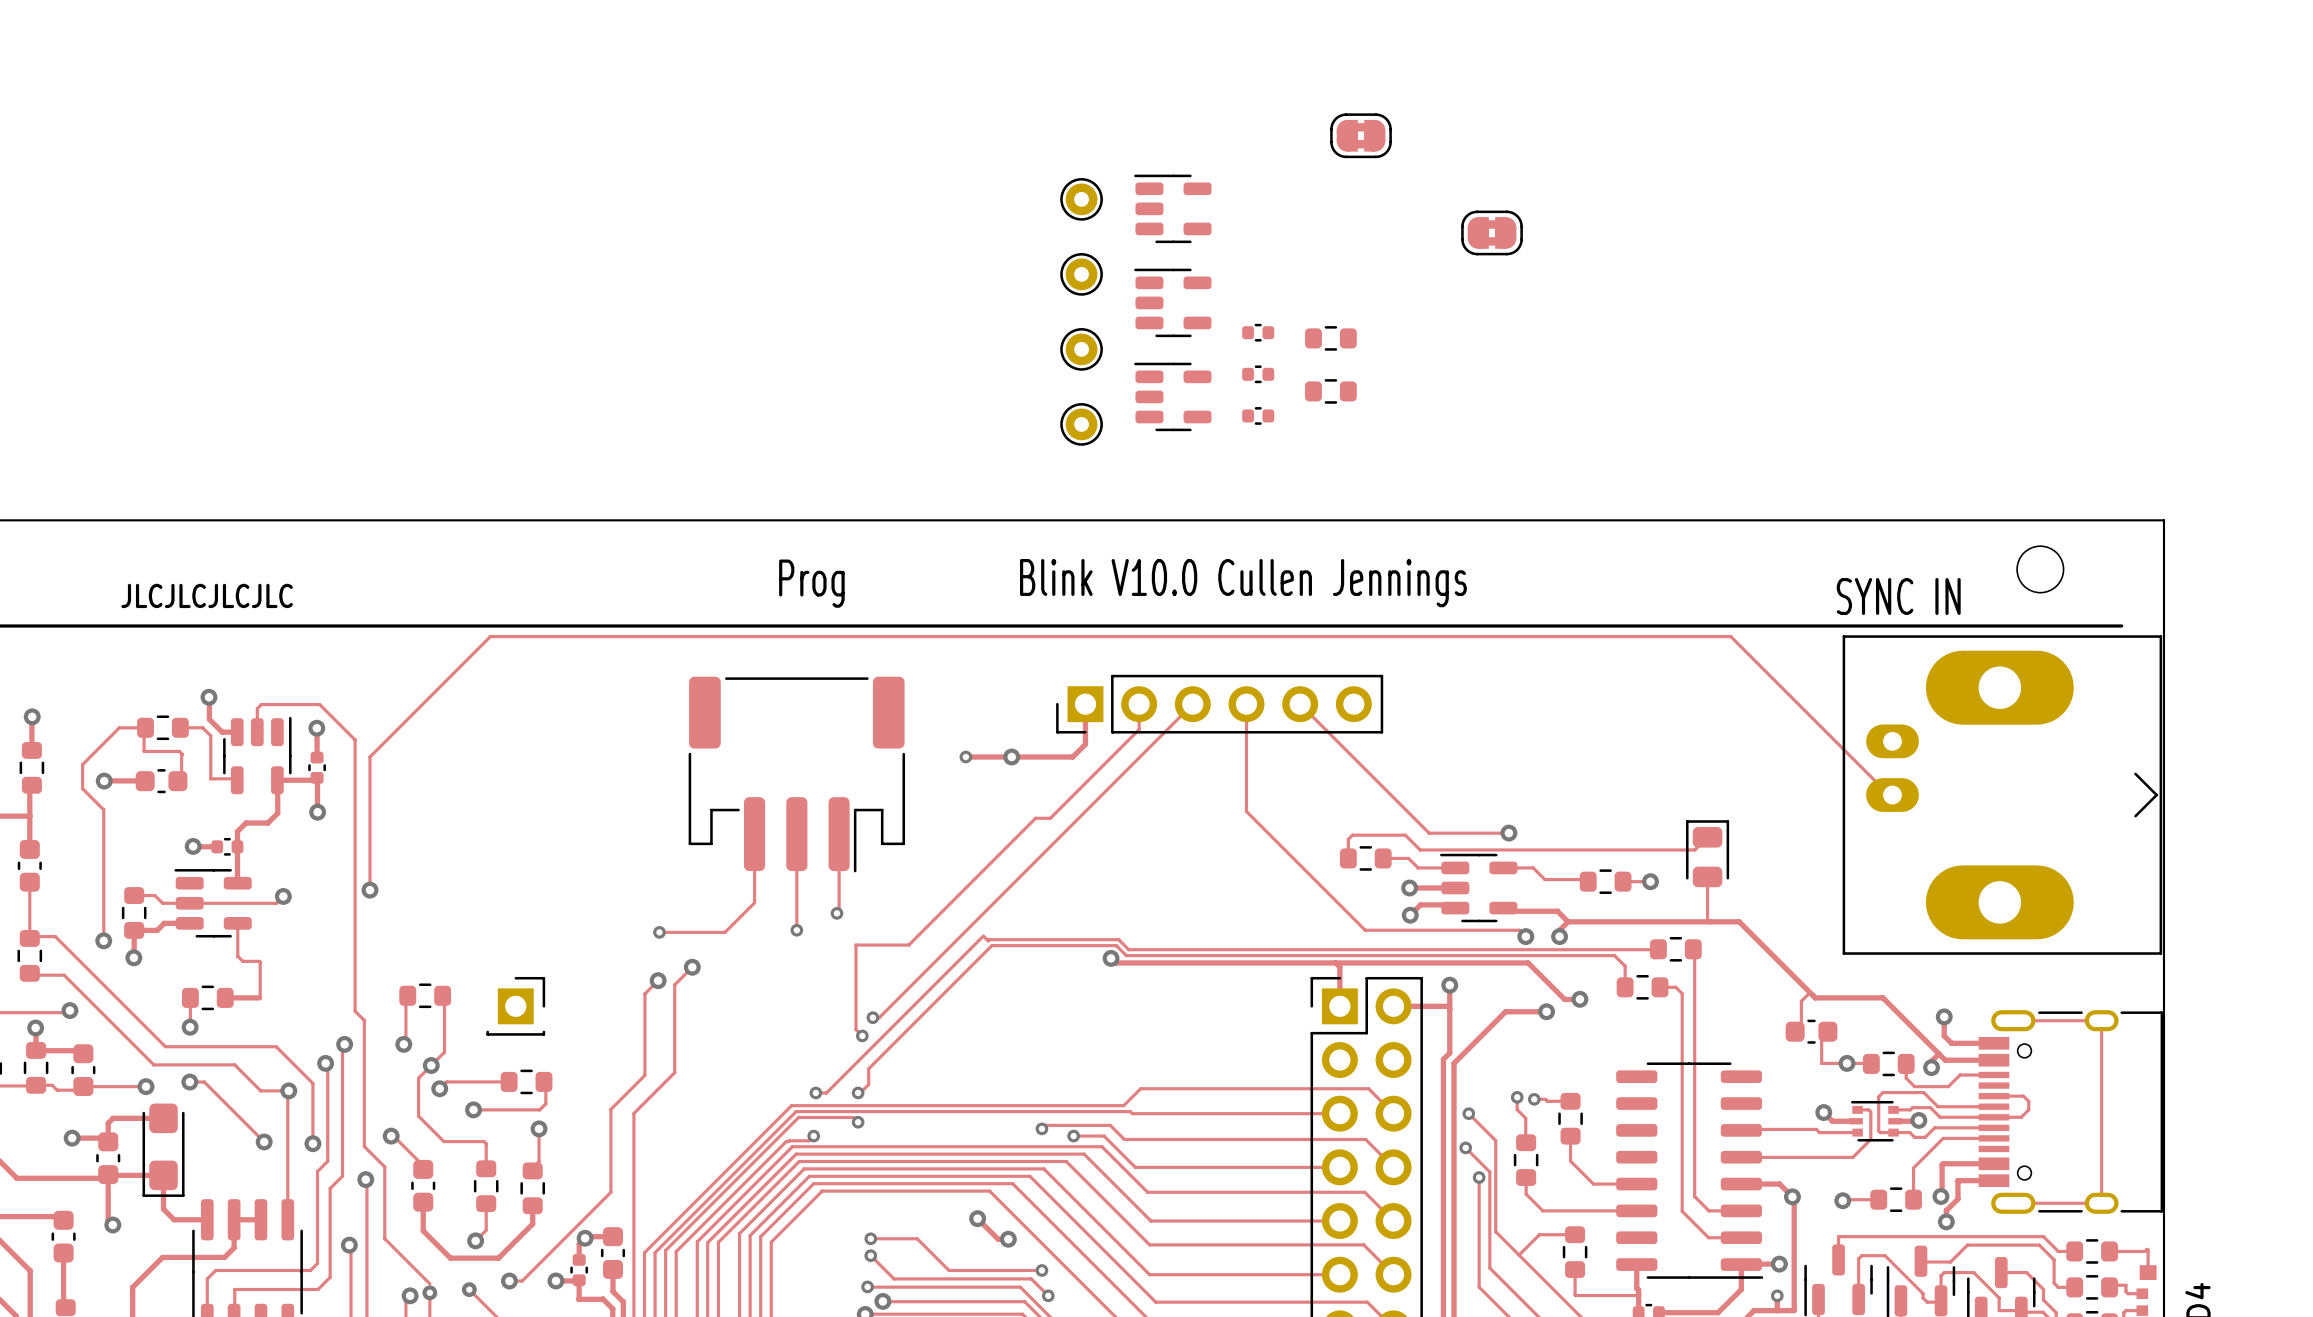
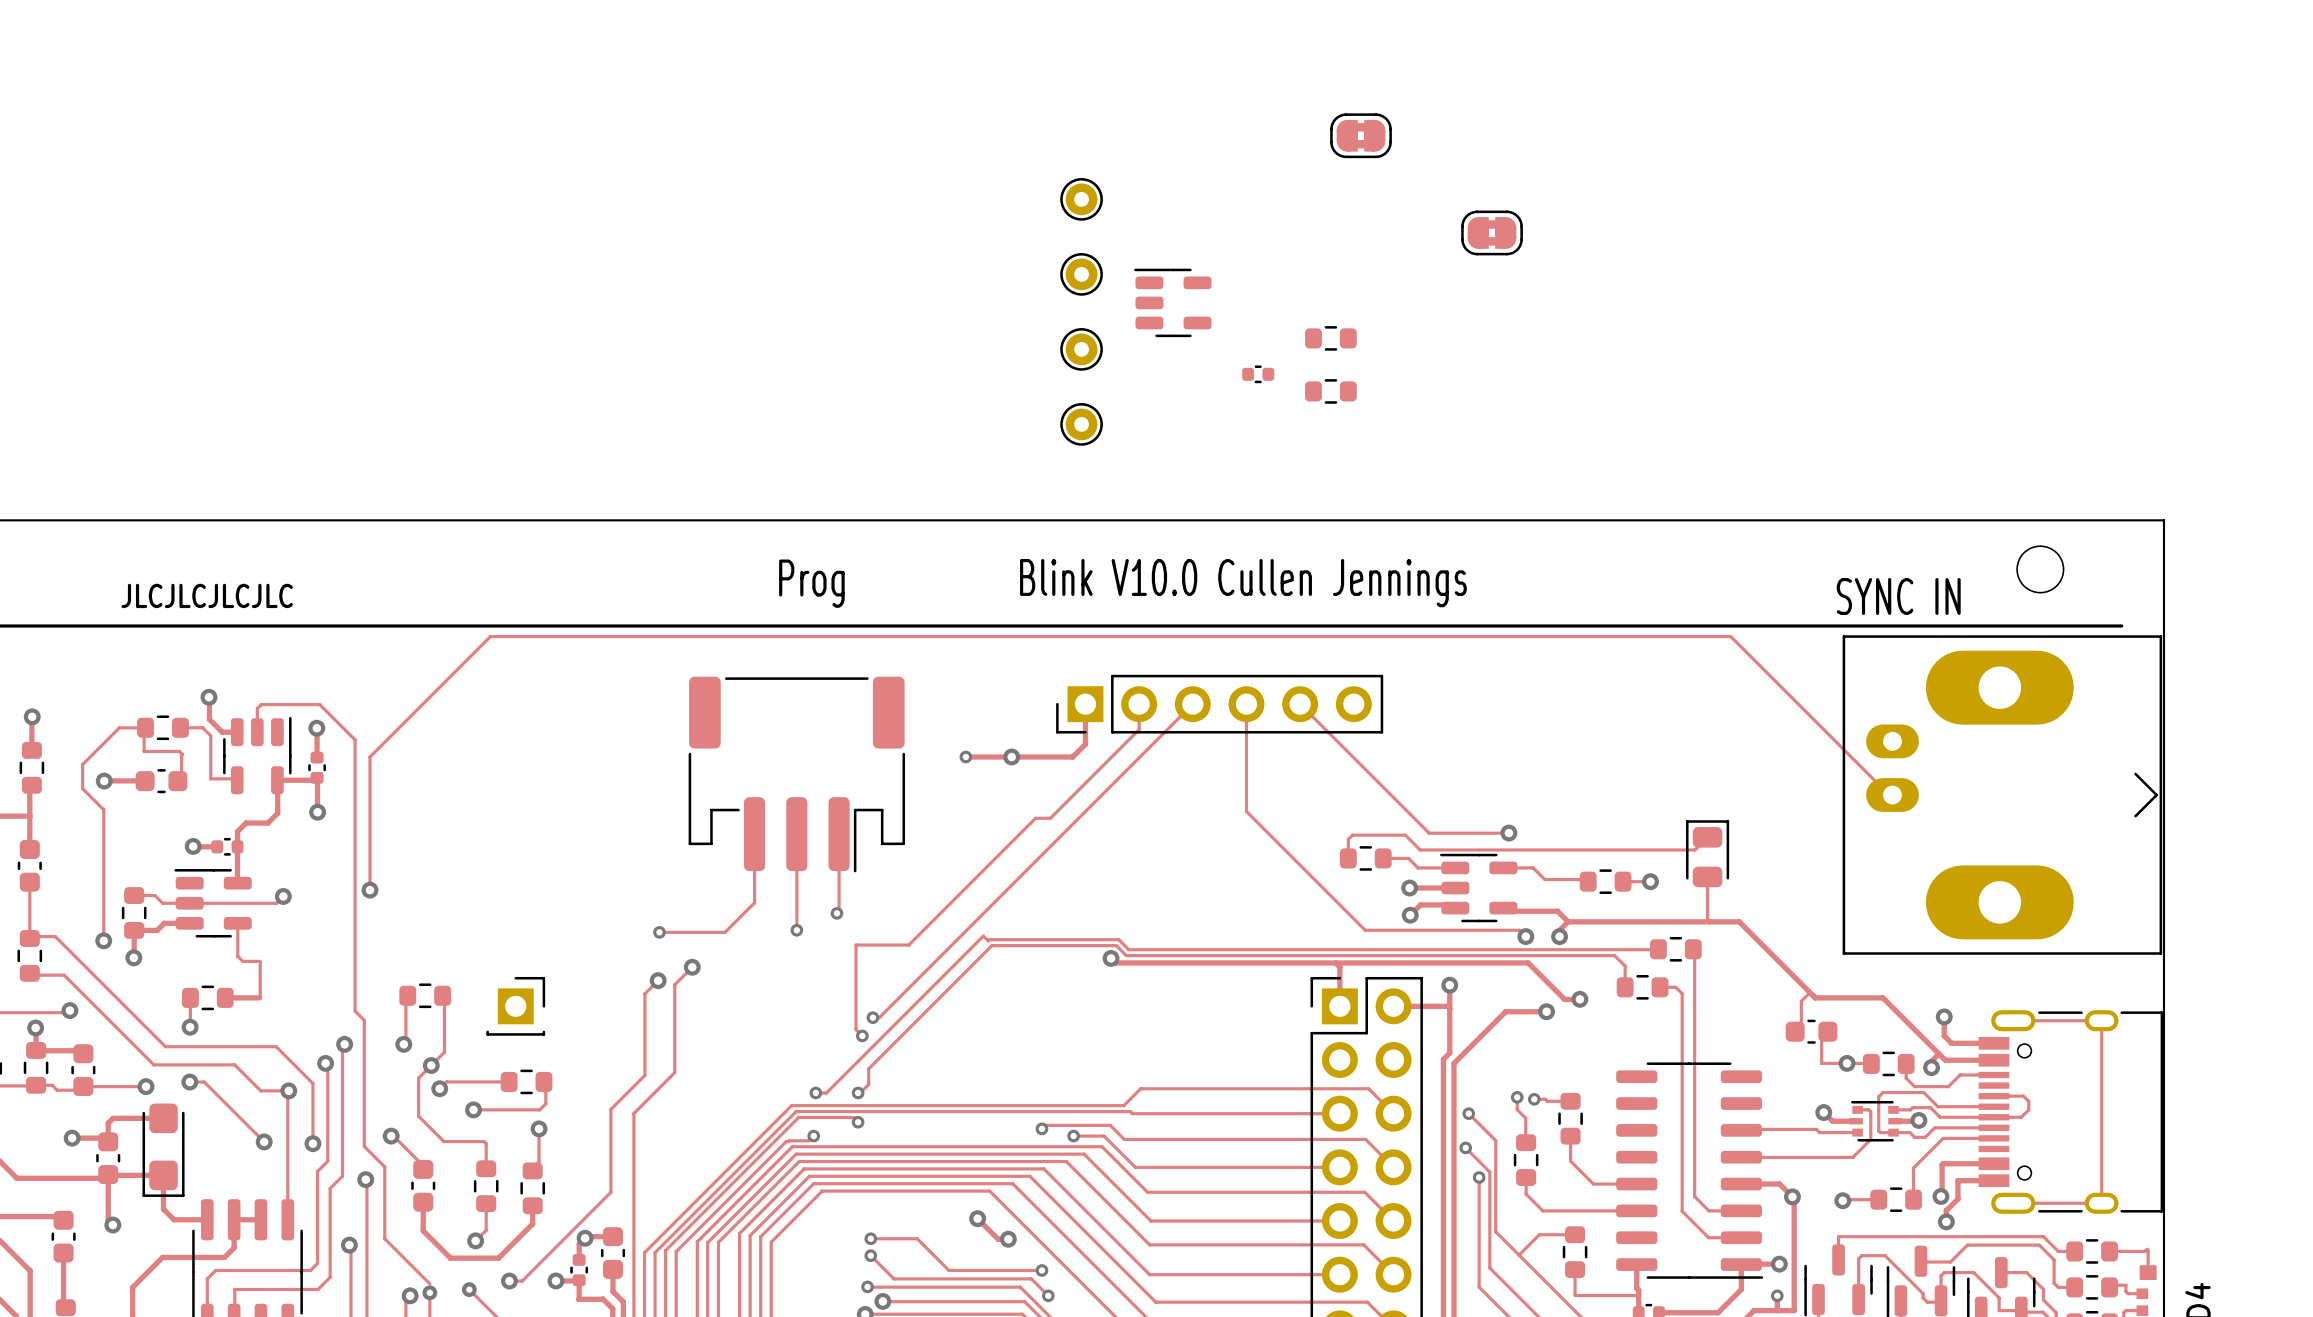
part: (1172, 208) -> none
part: (1258, 332) -> none
part: (1172, 396) -> none
part: (1258, 415) -> none

